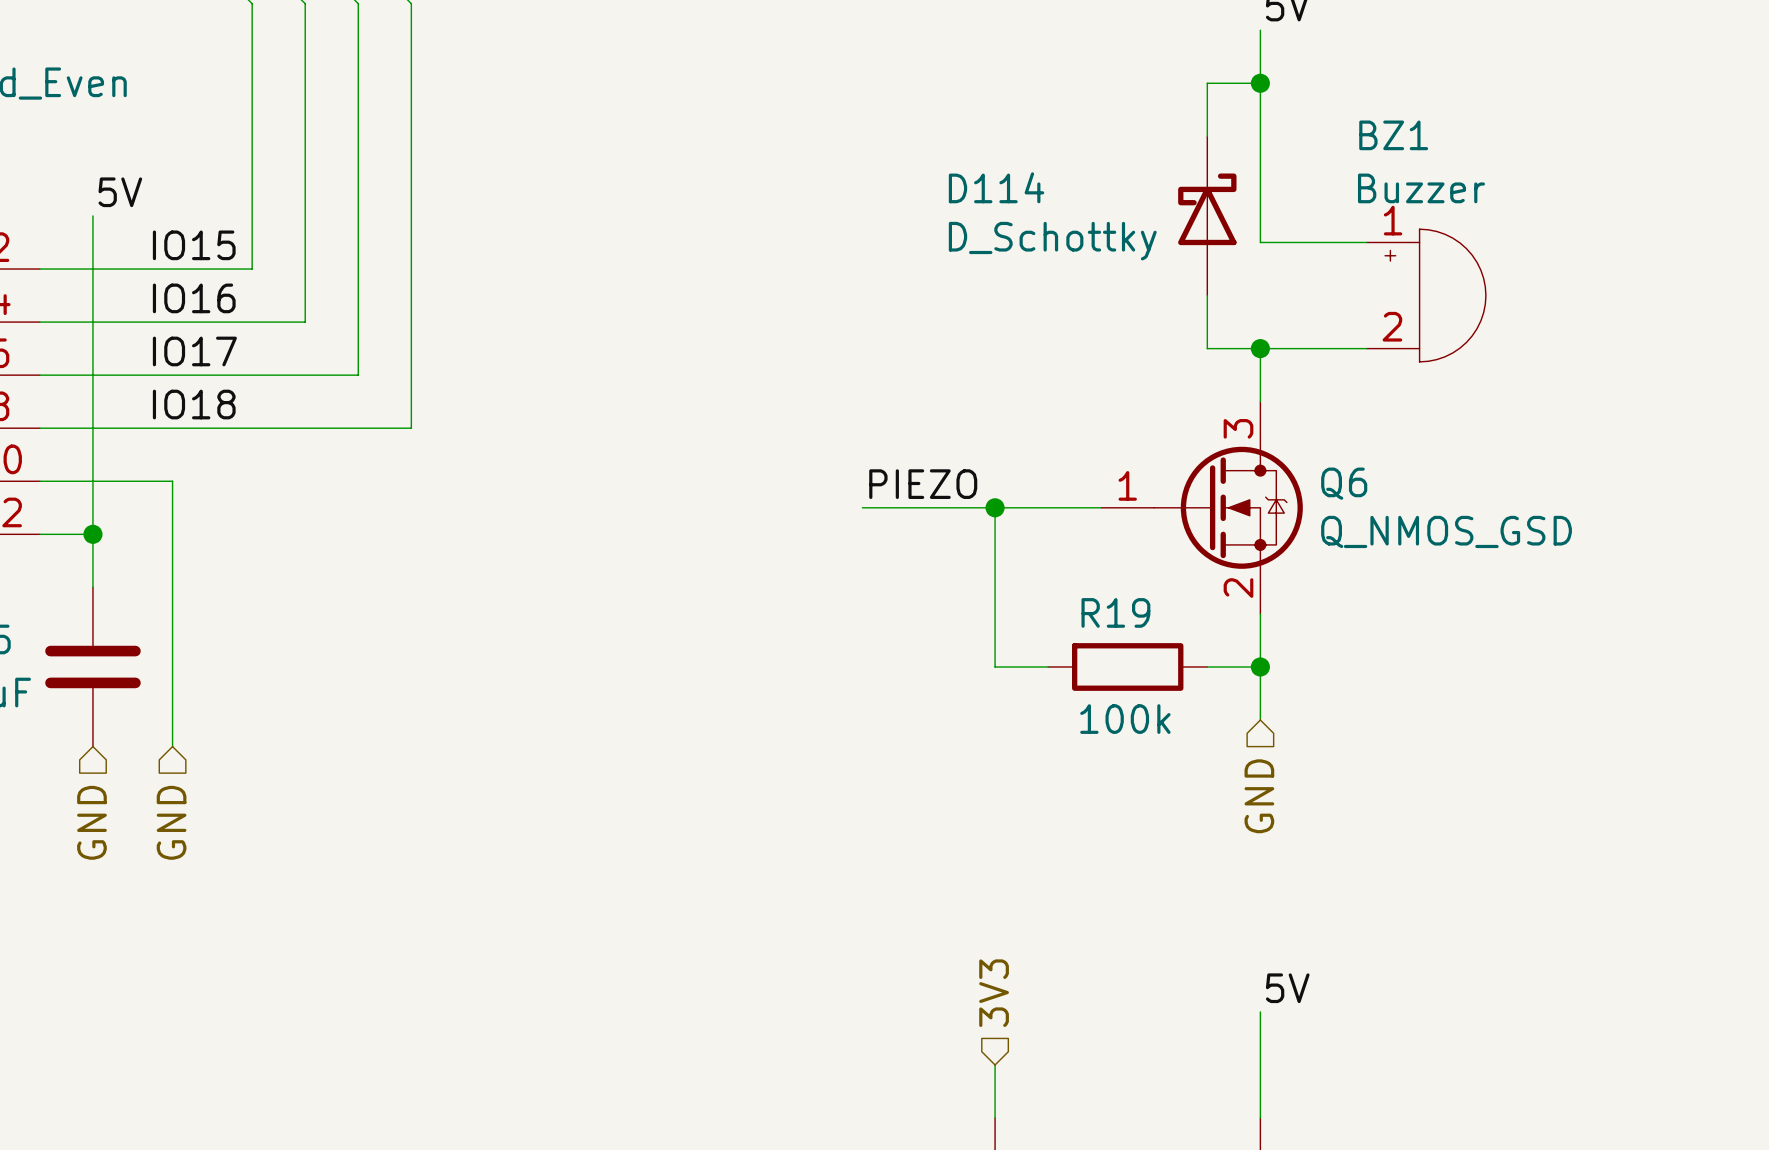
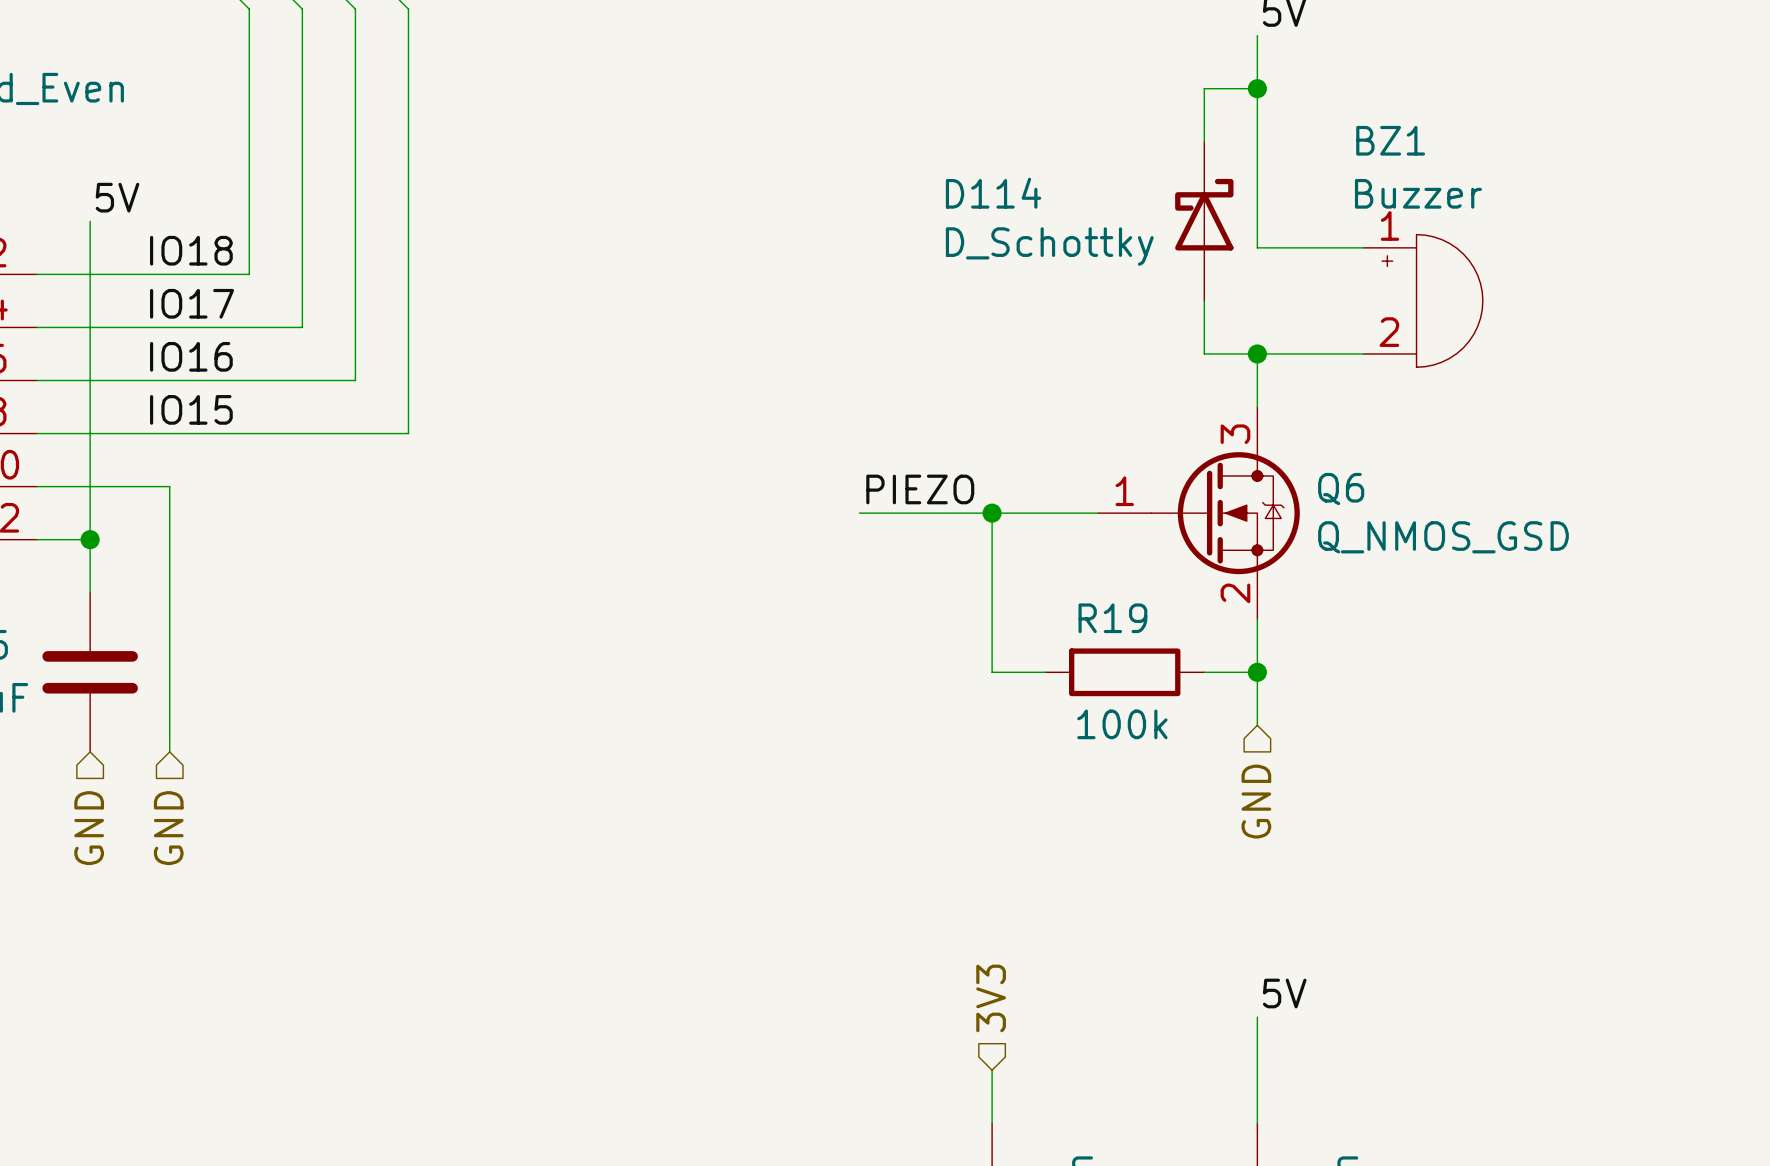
label: IO15 (194, 245) -> IO18 (191, 250)
label: IO16 (194, 298) -> IO17 (192, 303)
label: IO17 (194, 351) -> IO16 (191, 356)
label: IO18 (194, 404) -> IO15 (191, 409)

